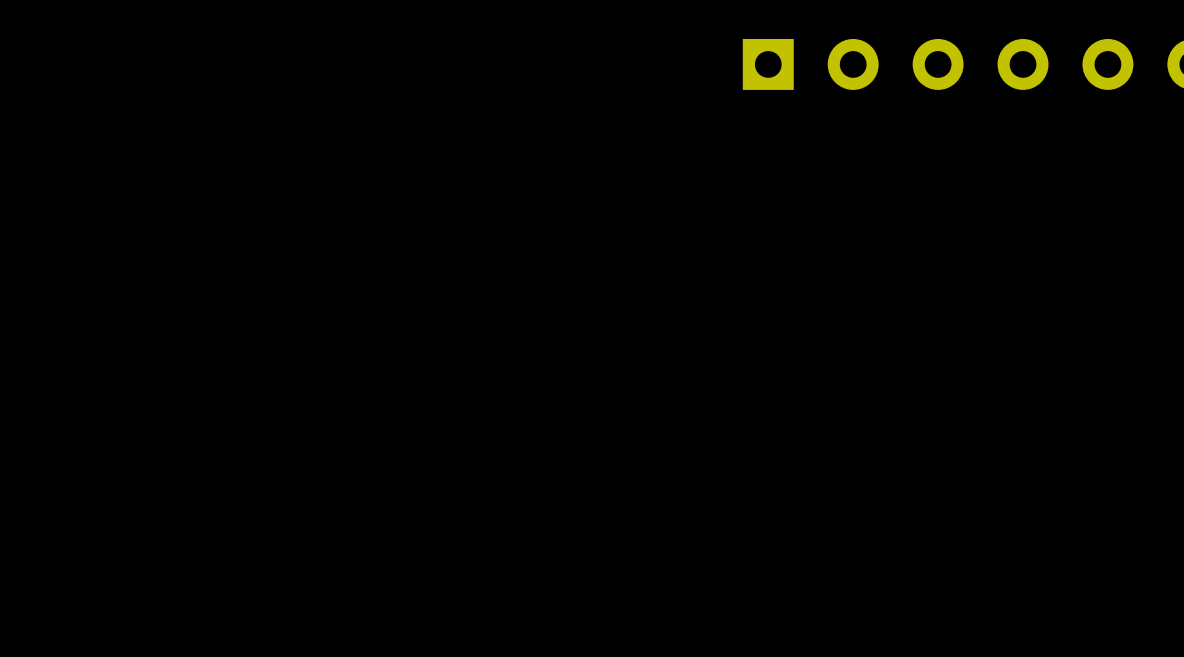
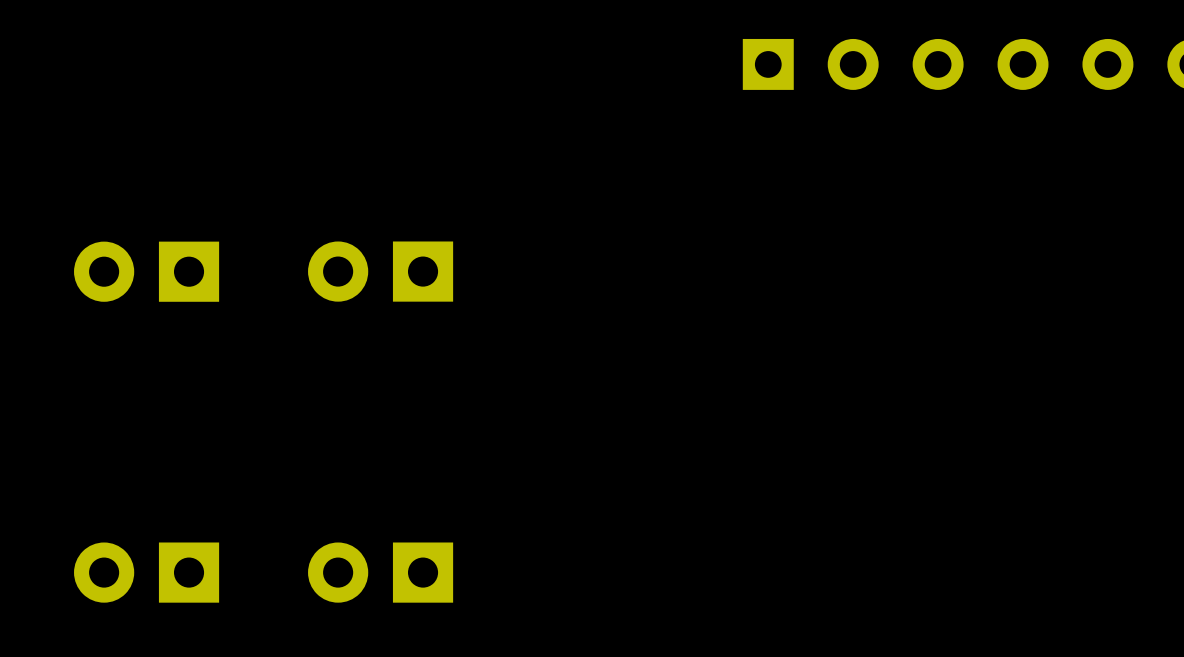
part: none -> (146, 271)
part: none -> (380, 271)
part: none -> (146, 572)
part: none -> (380, 572)

